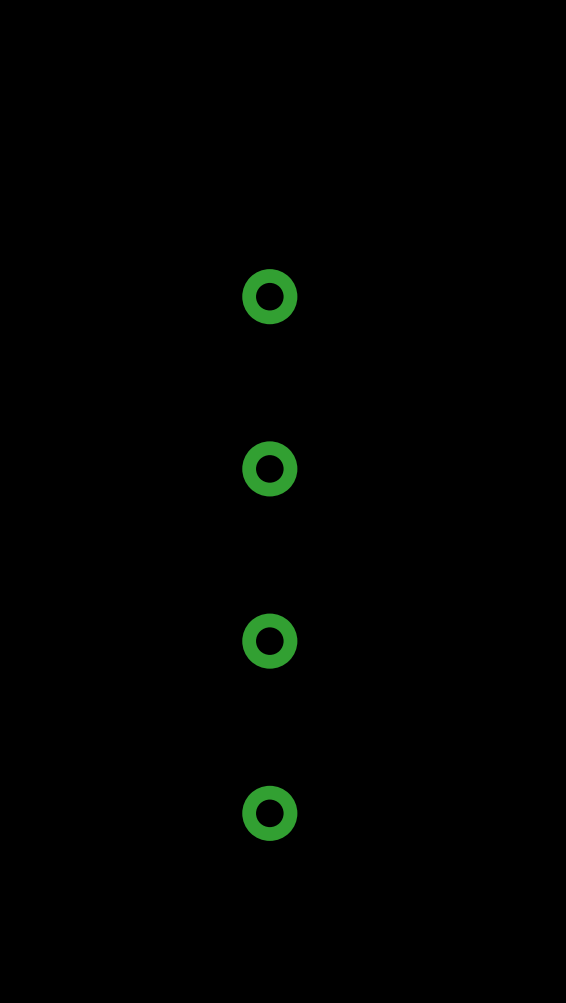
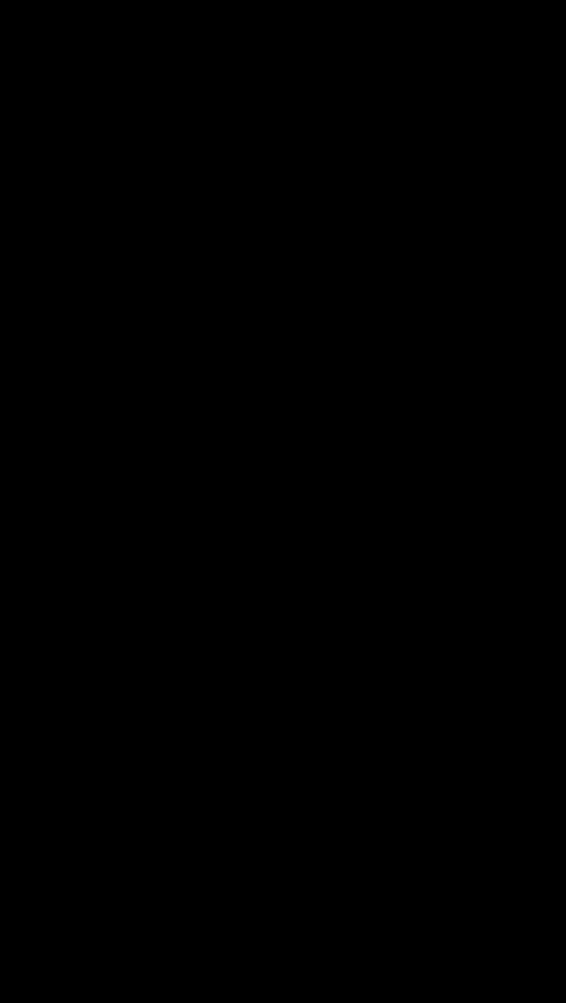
via: (269, 296) -> none
via: (269, 468) -> none
via: (269, 641) -> none
via: (269, 813) -> none

